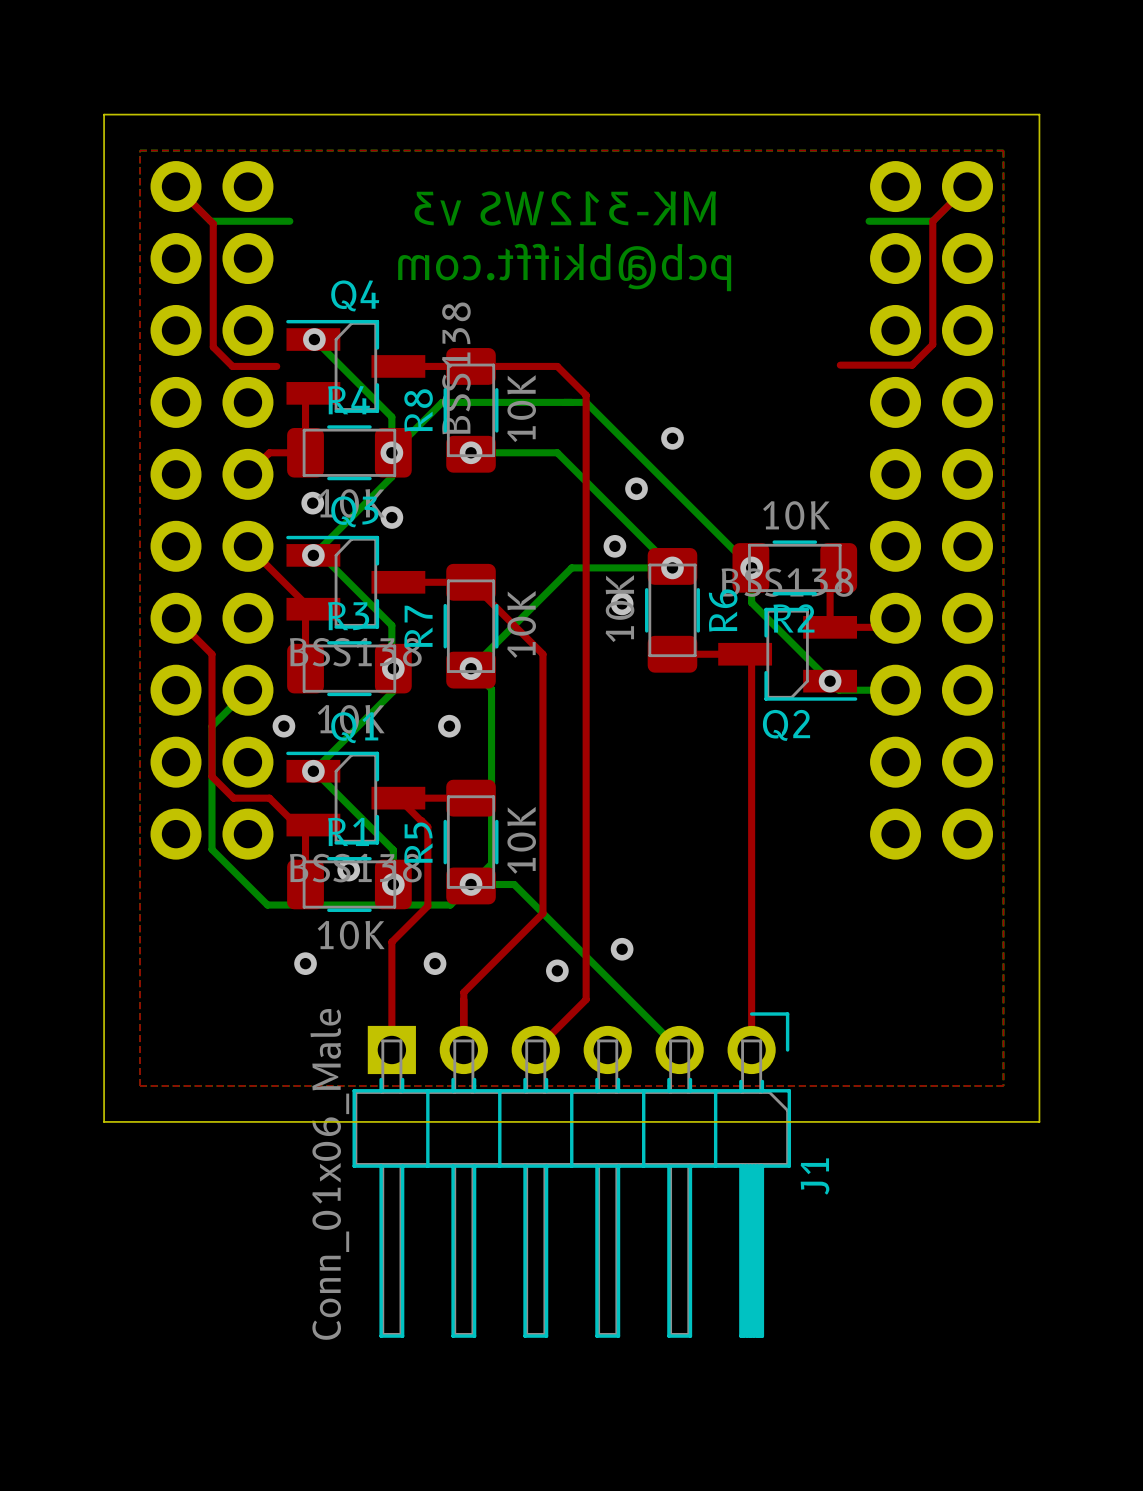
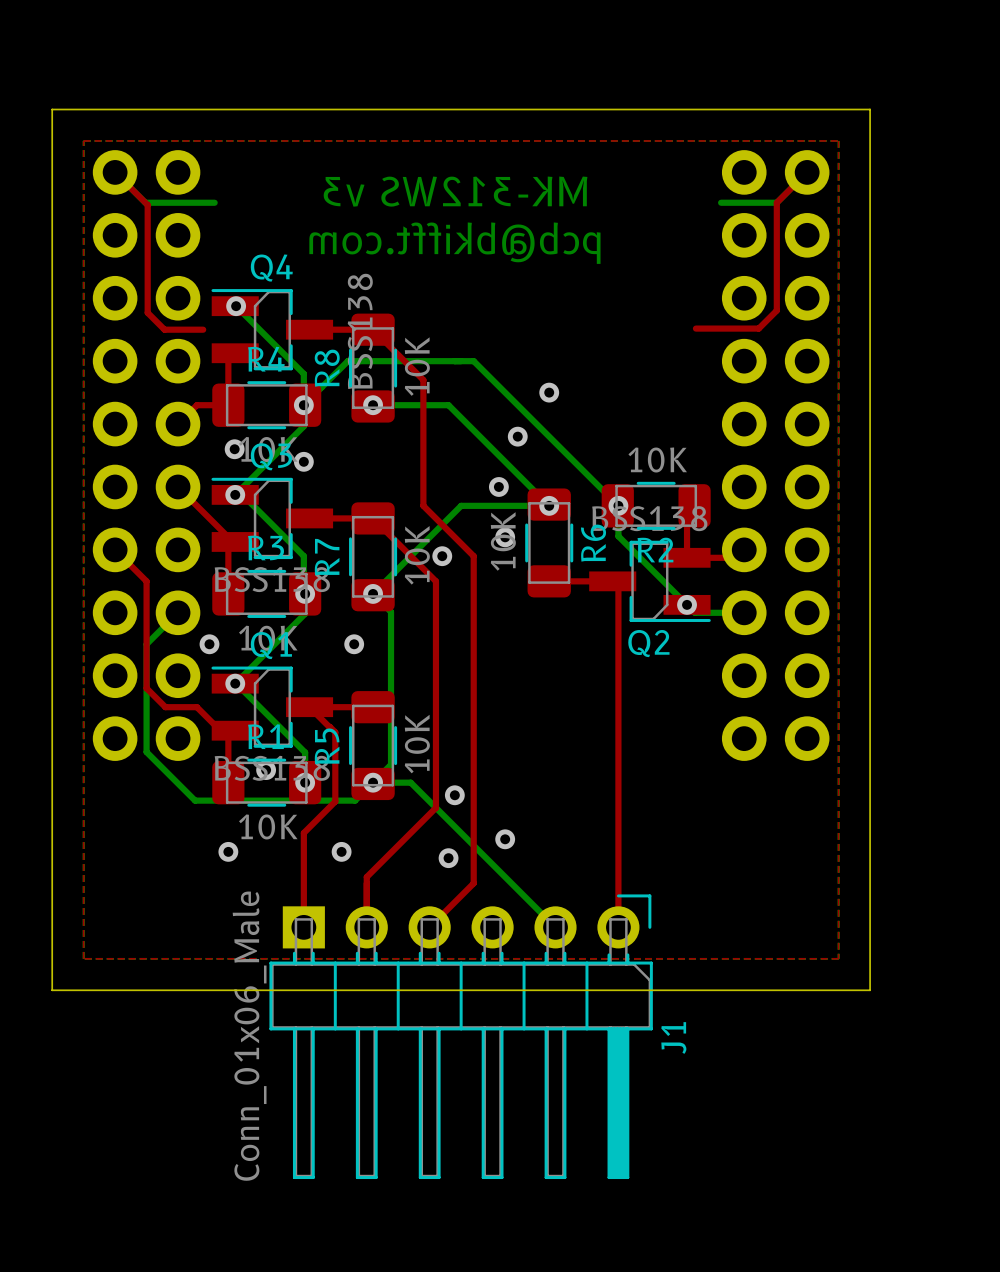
top track: (471, 366) (557, 366) (586, 395) (586, 625) -> (373, 329) (423, 380) (423, 505) (473, 556)
via: none -> (442, 556)
via: none -> (454, 795)

